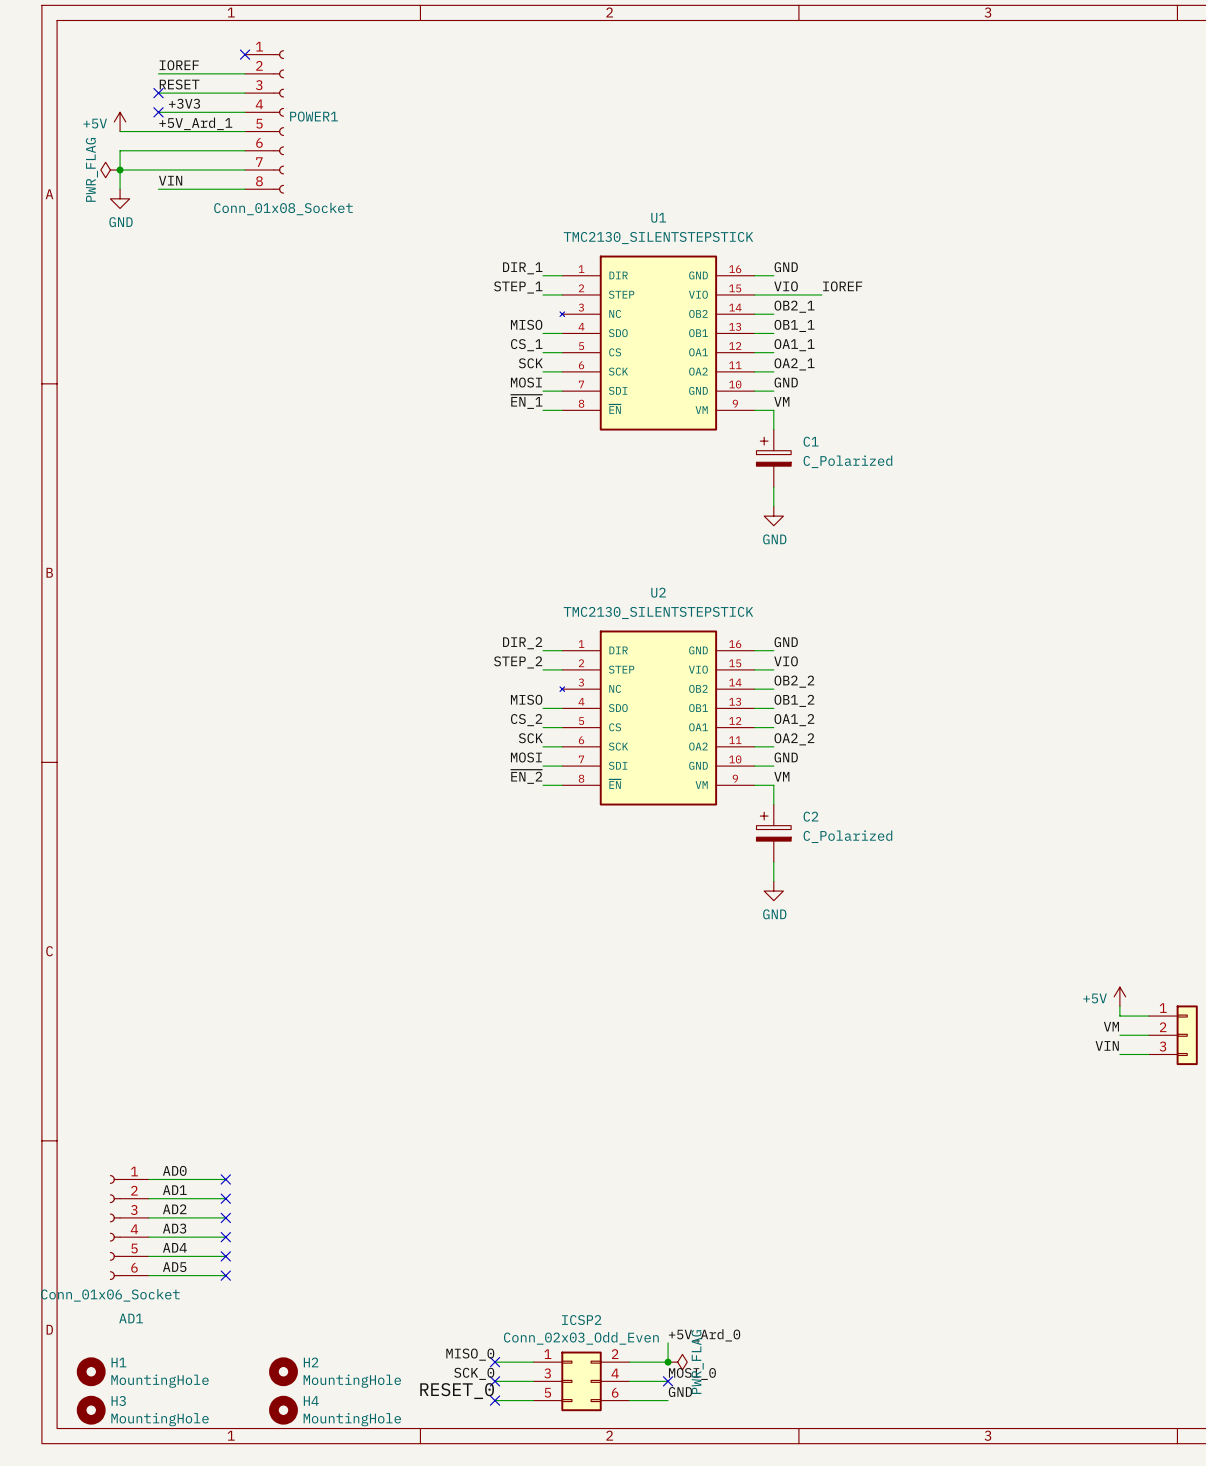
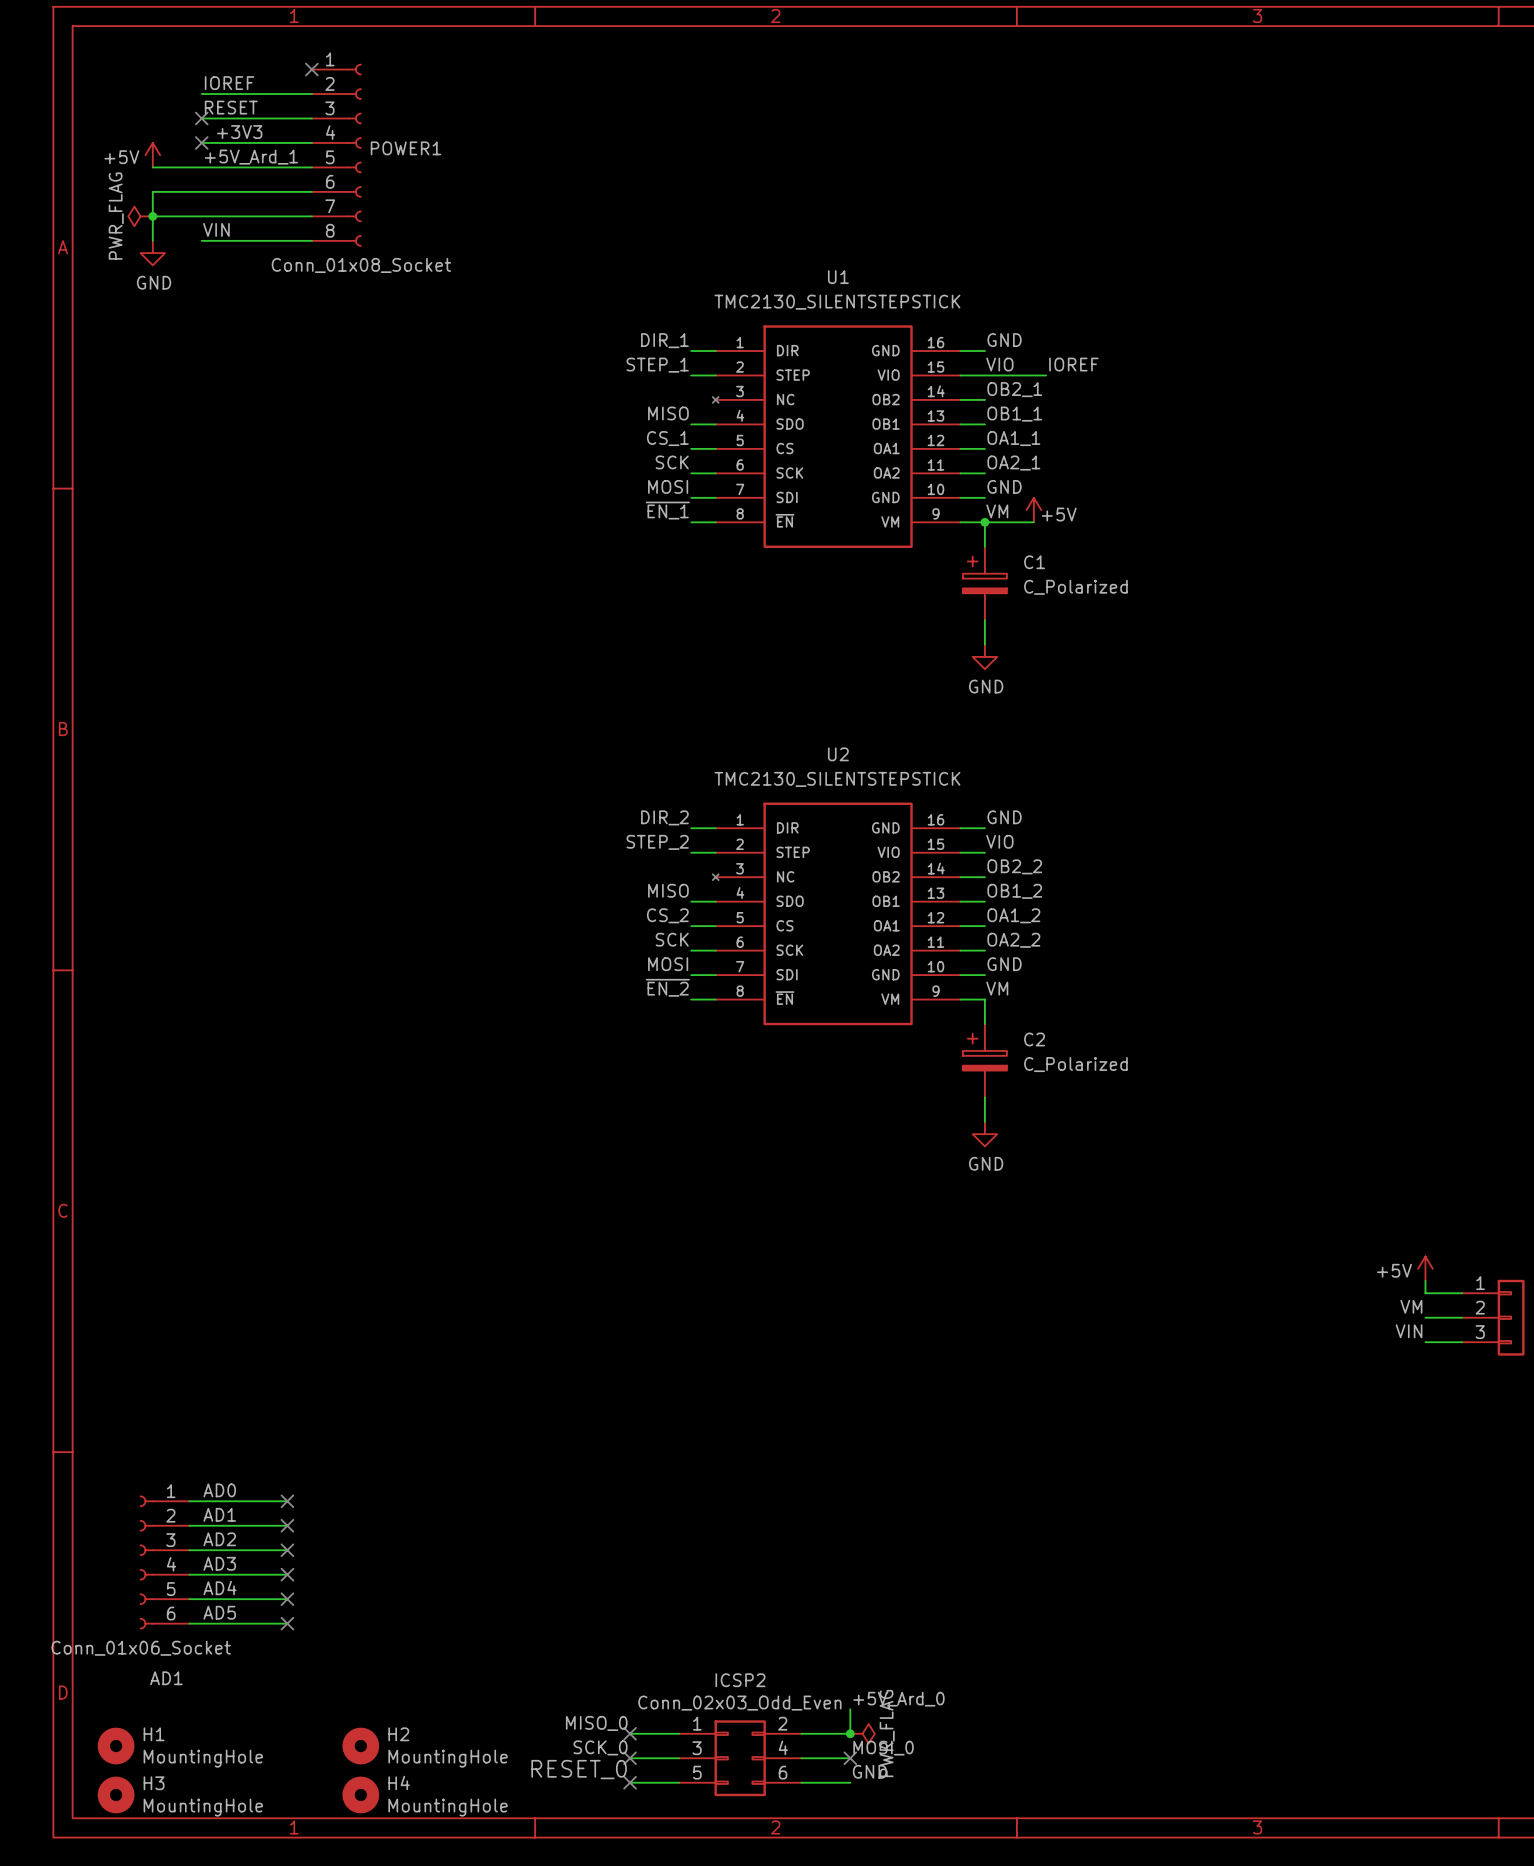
power symbol: none -> +5V (1033, 510)
wire: none -> (984, 522) (1033, 522)
junction: none -> (984, 522)

